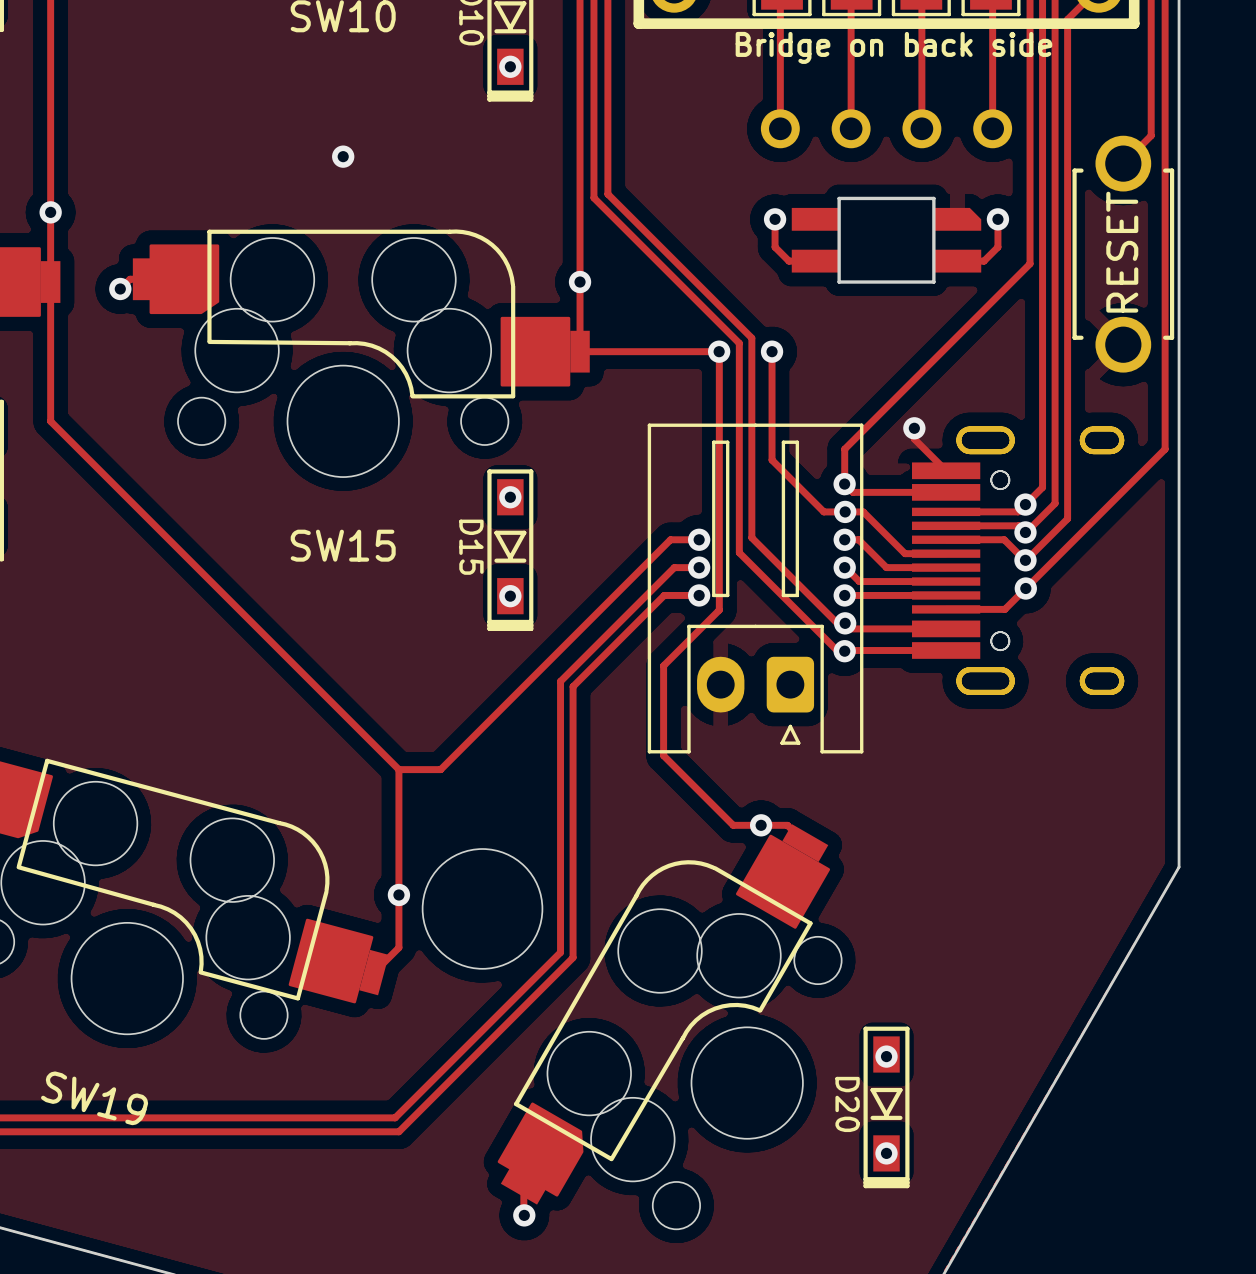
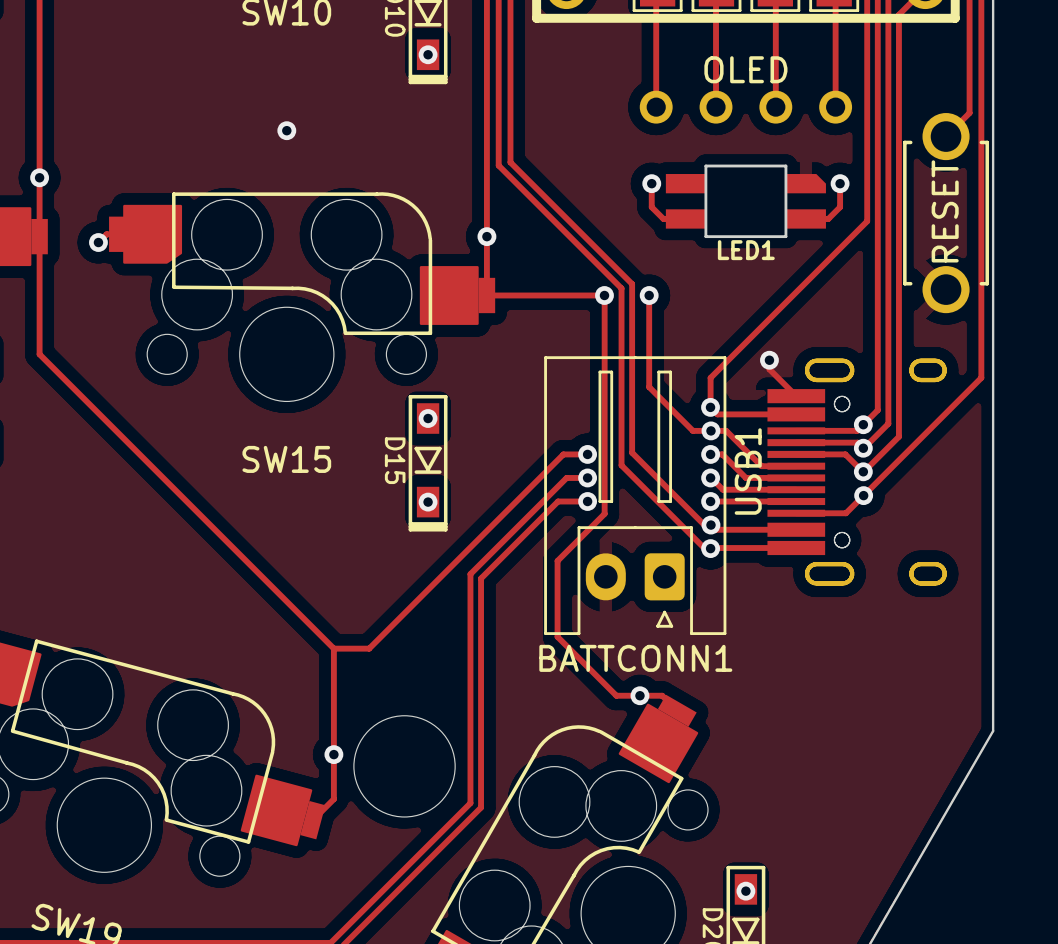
text: Bridge on back side (893, 47) -> none
part text: none -> OLED (745, 69)
LED1 name: none -> LED1 (746, 250)
USB1 name: none -> USB1 (748, 471)
BATTCONN1 name: none -> BATTCONN1 (635, 658)

